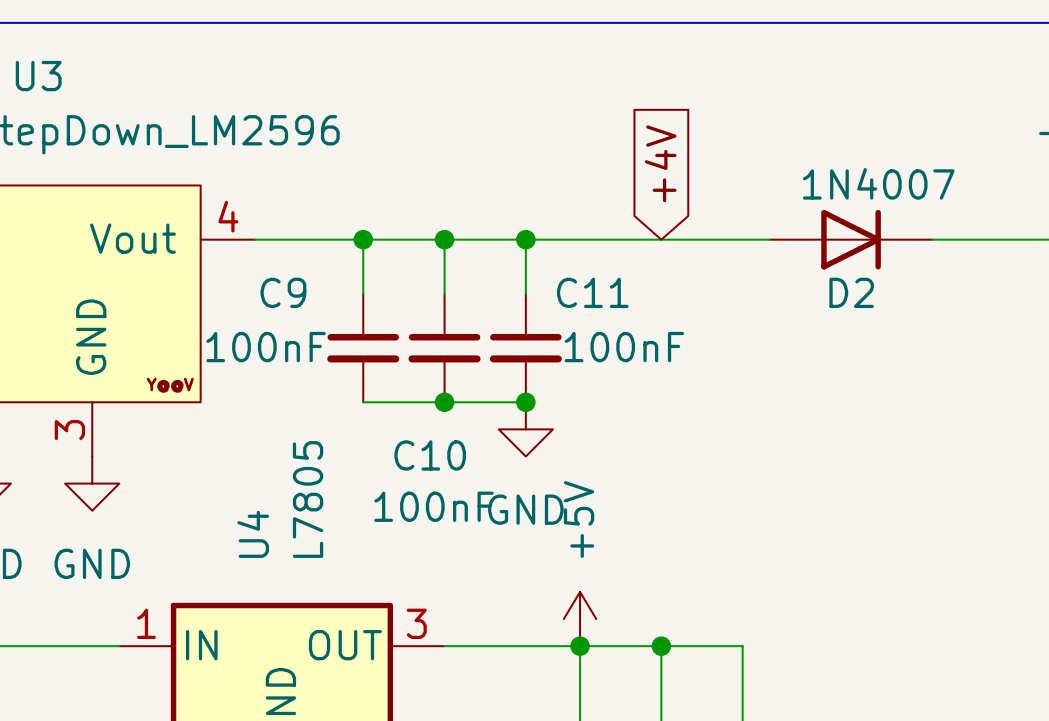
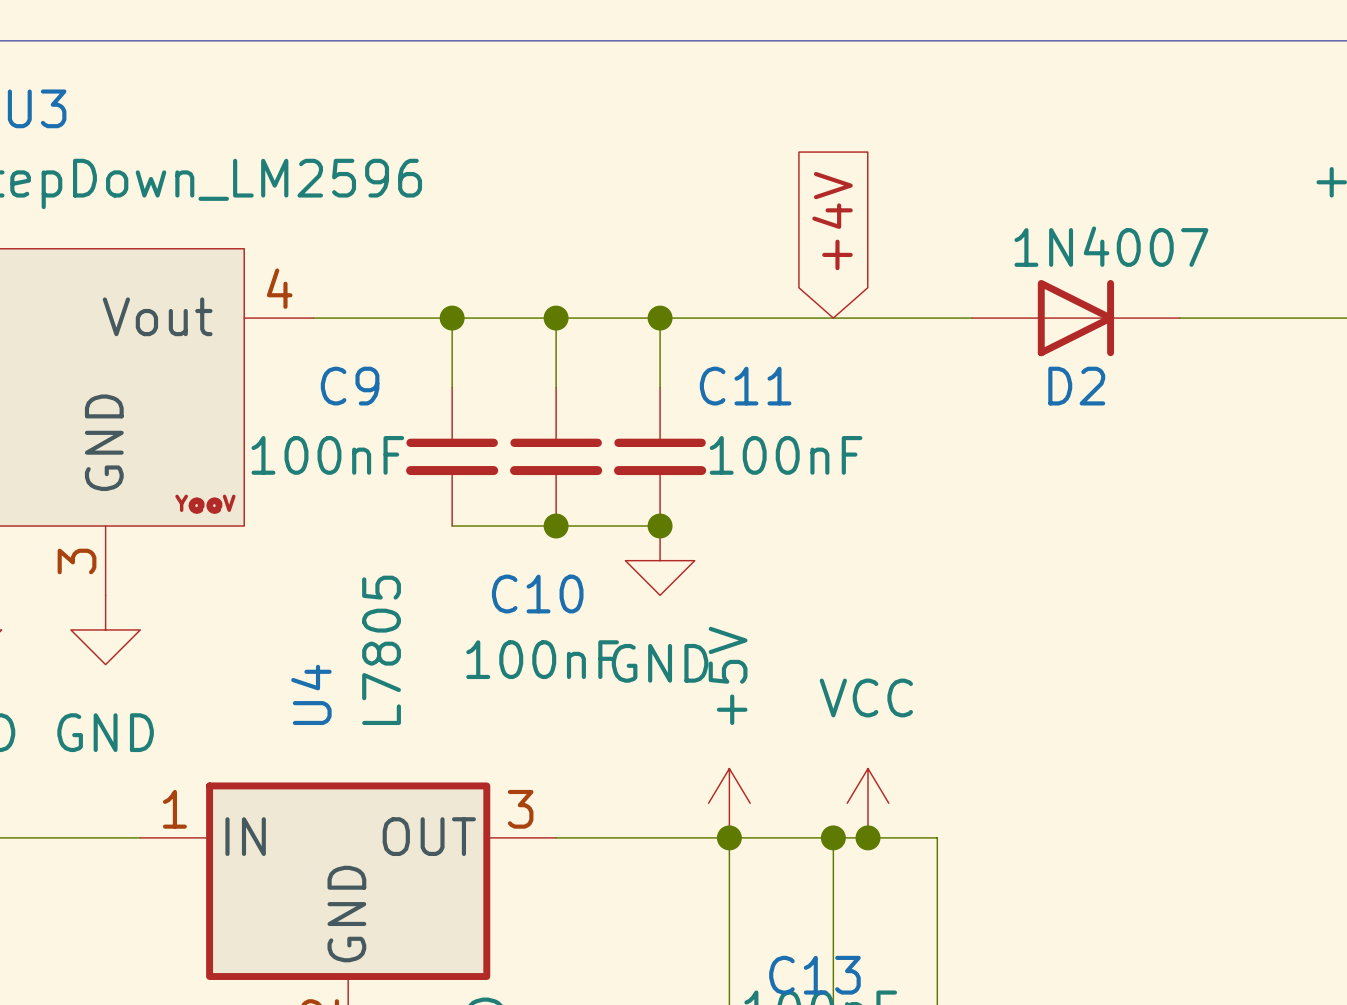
power symbol: none -> VCC (868, 803)
junction: none -> (868, 837)

